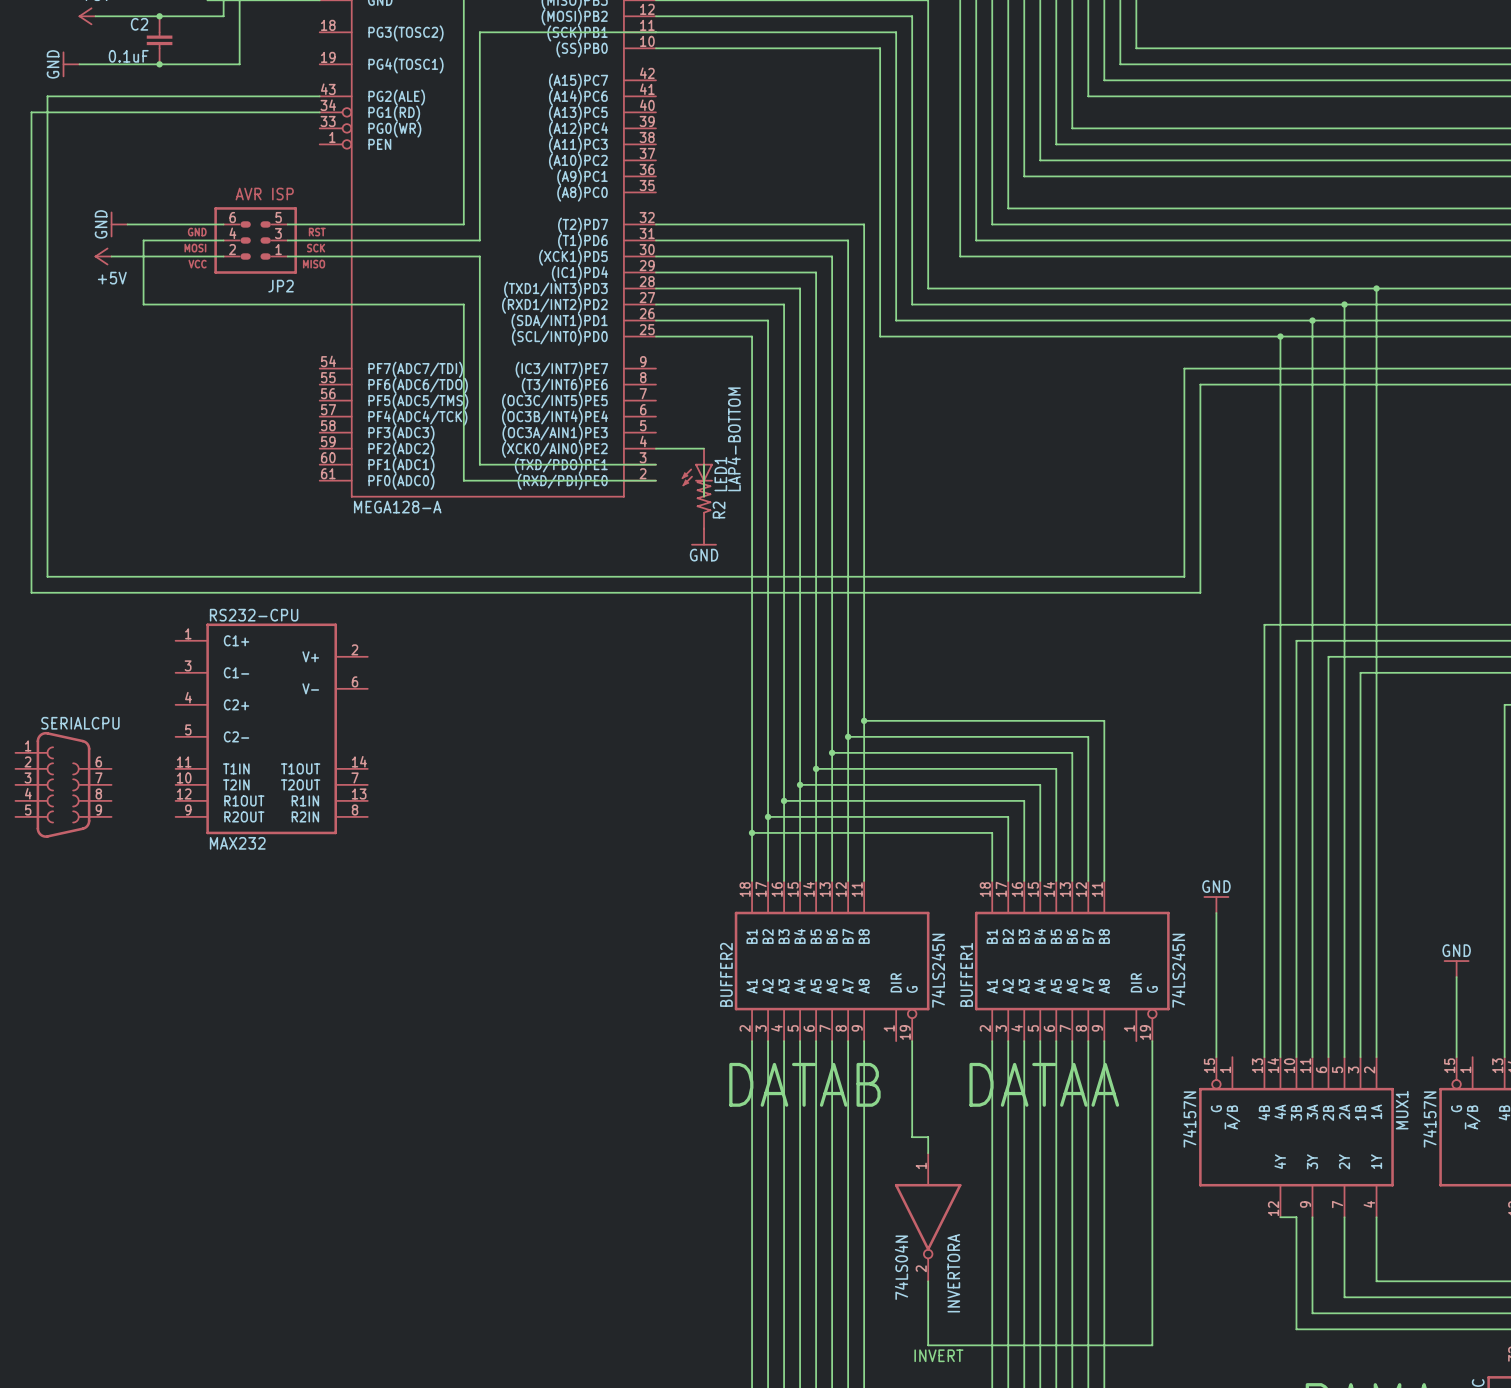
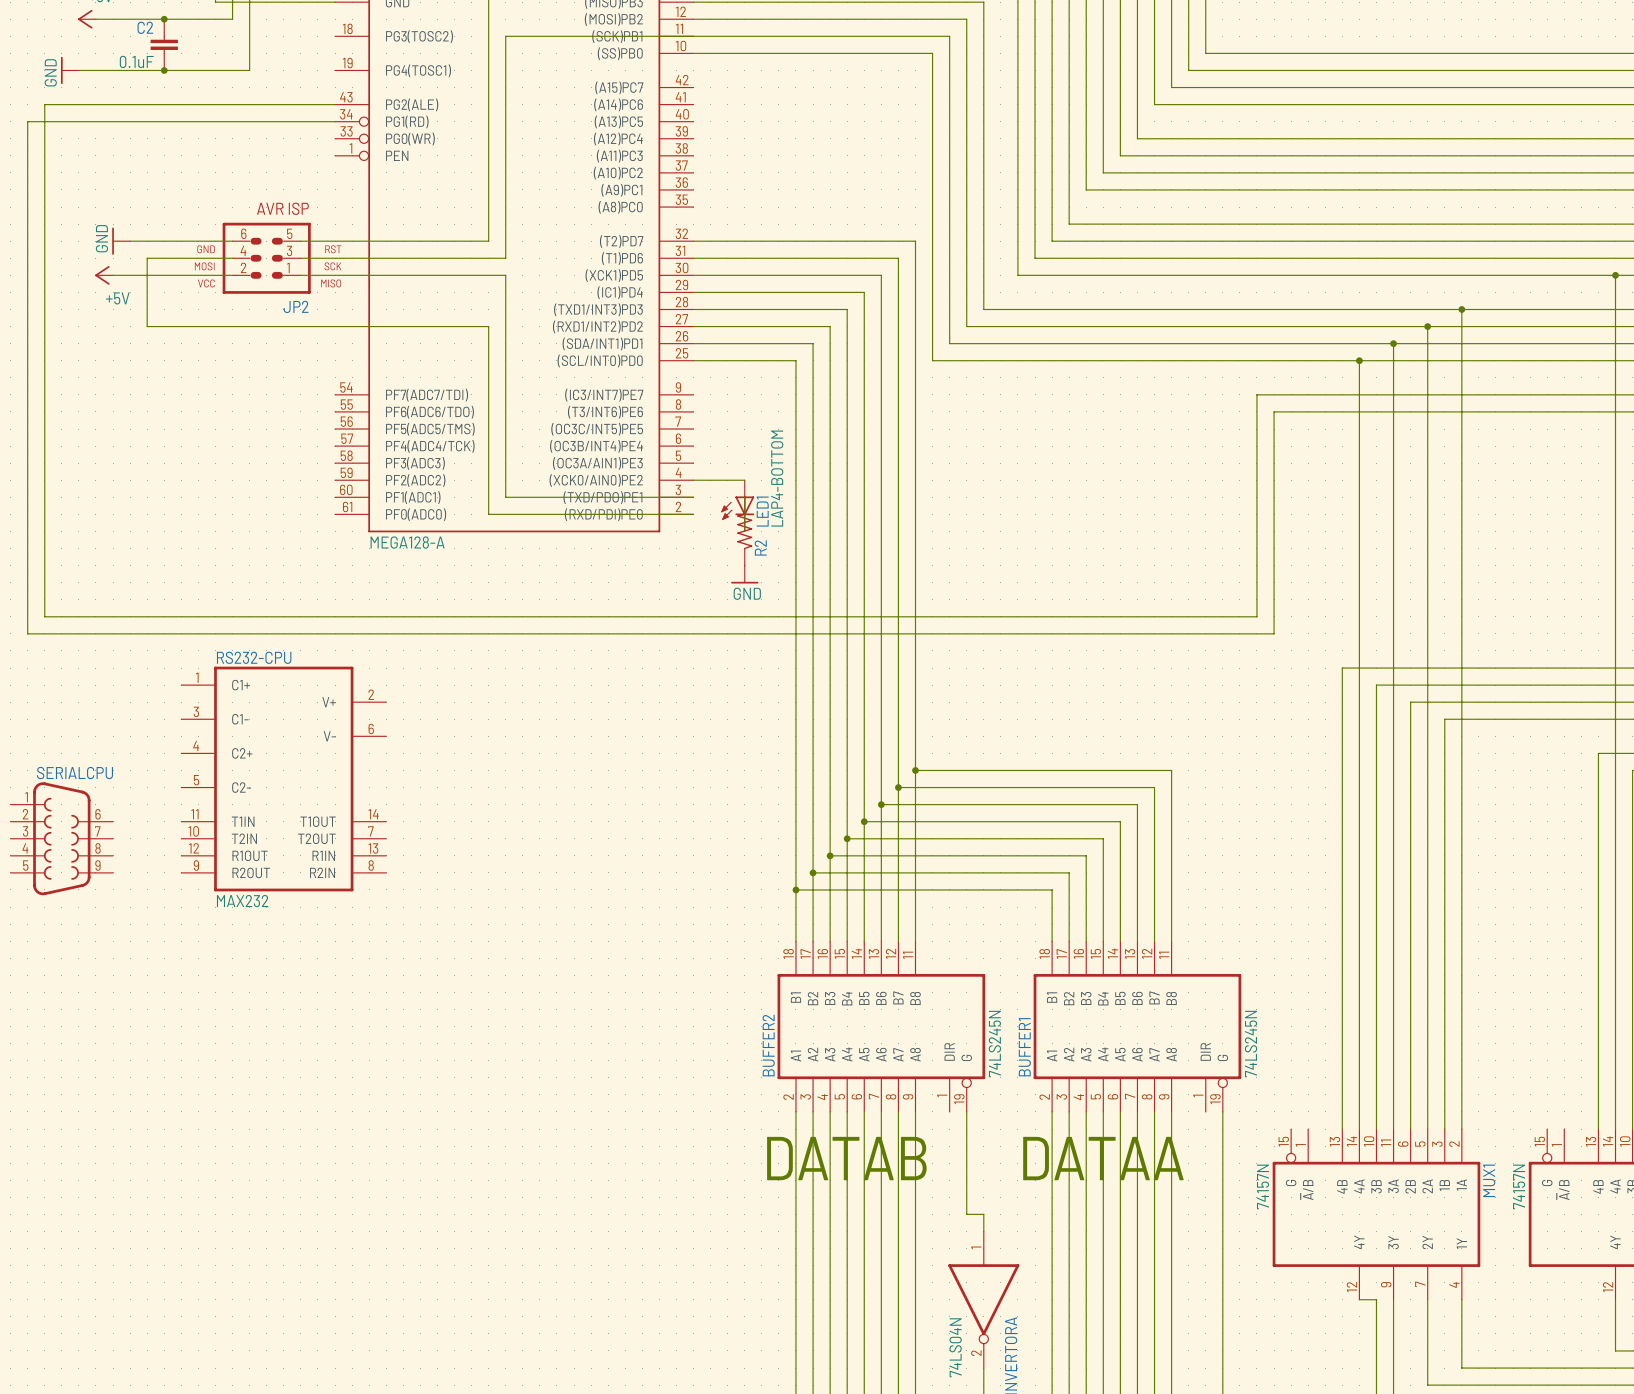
power symbol: GND (1216, 904) -> none
wire: (1216, 913) (1216, 1057) -> none
power symbol: GND (1456, 968) -> none
wire: (1456, 977) (1456, 1057) -> none

